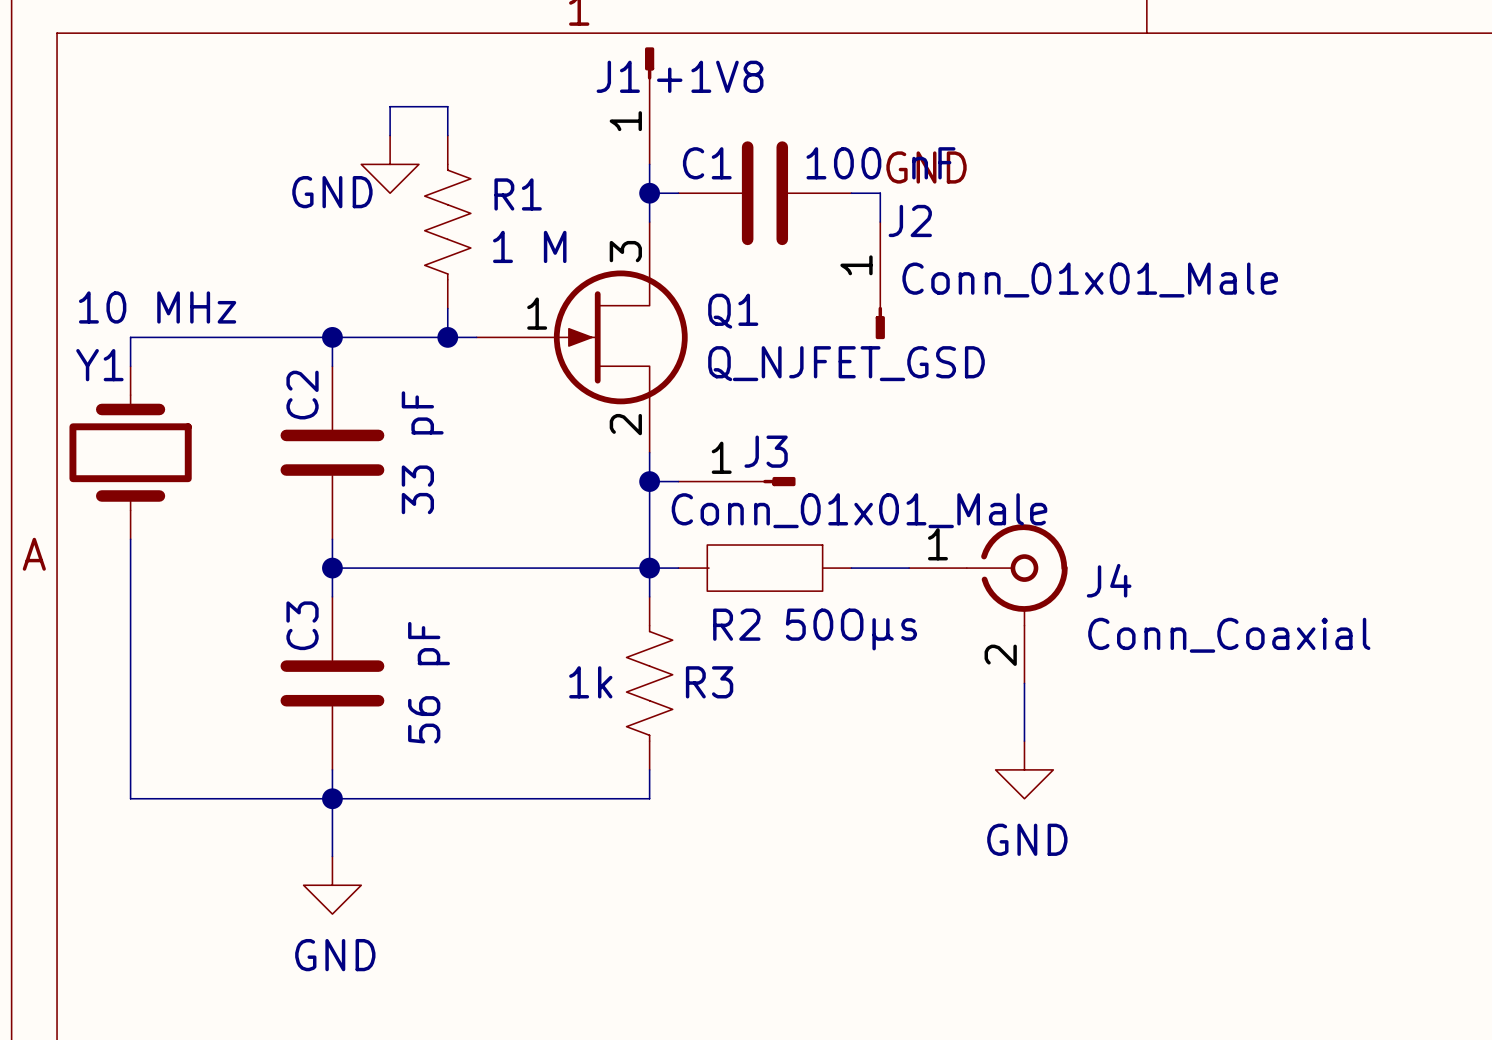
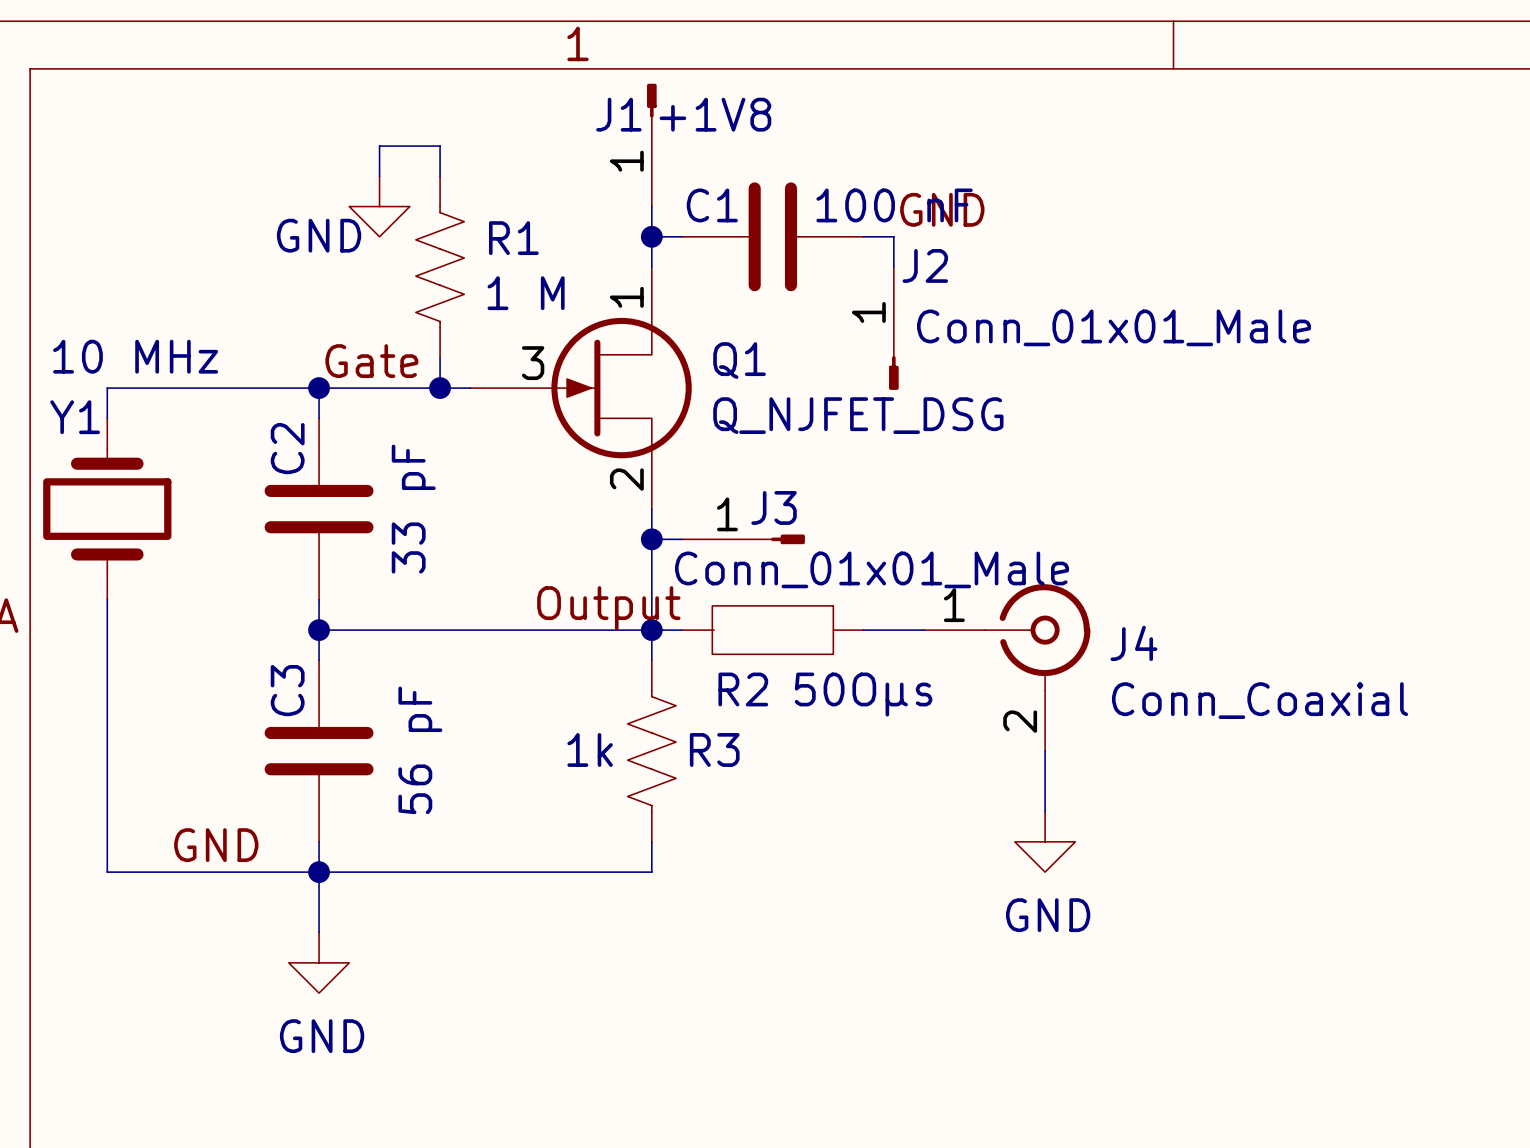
Q1 pin number: 3 (625, 251) -> 1 (626, 297)
label: none -> Gate (371, 361)
Q1 pin number: 1 (537, 313) -> 3 (533, 363)
Q1 value: Q_NJFET_GSD (846, 363) -> Q_NJFET_DSG (858, 415)
label: none -> Output (608, 608)
label: none -> GND (216, 845)

